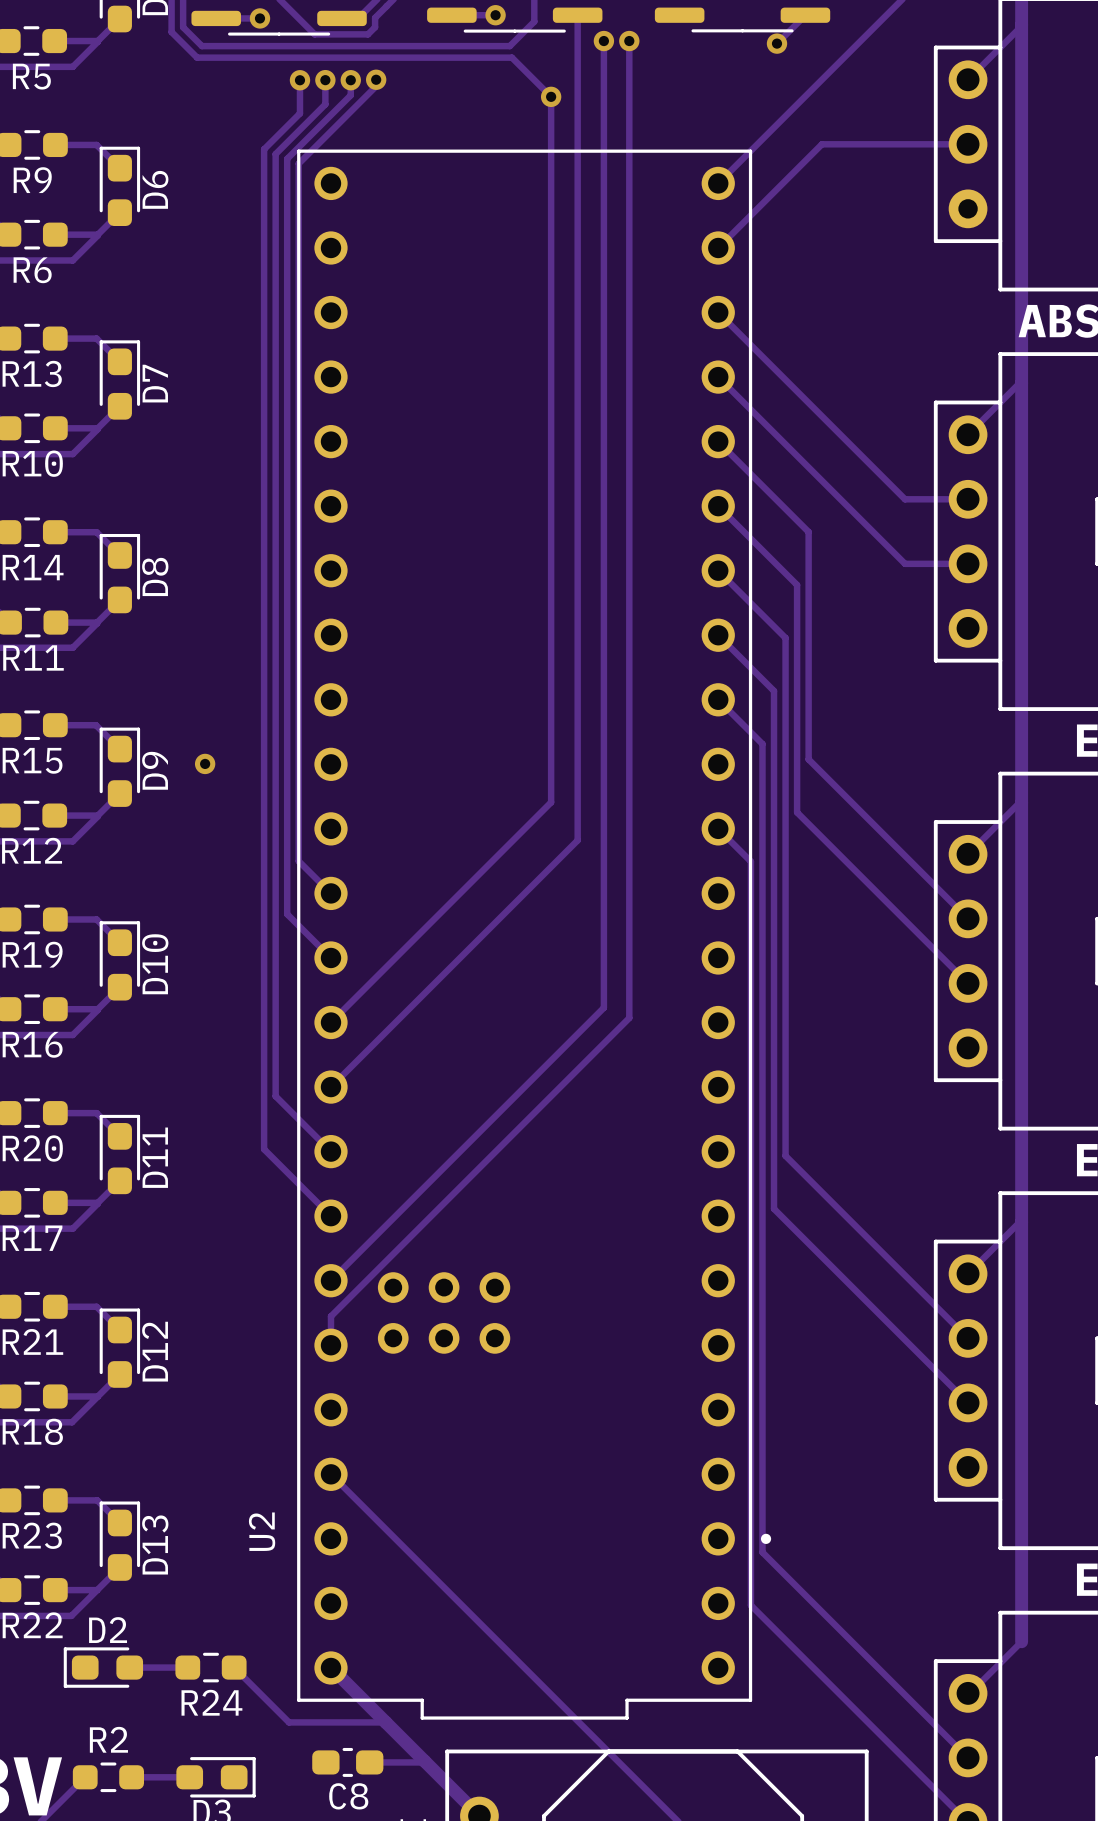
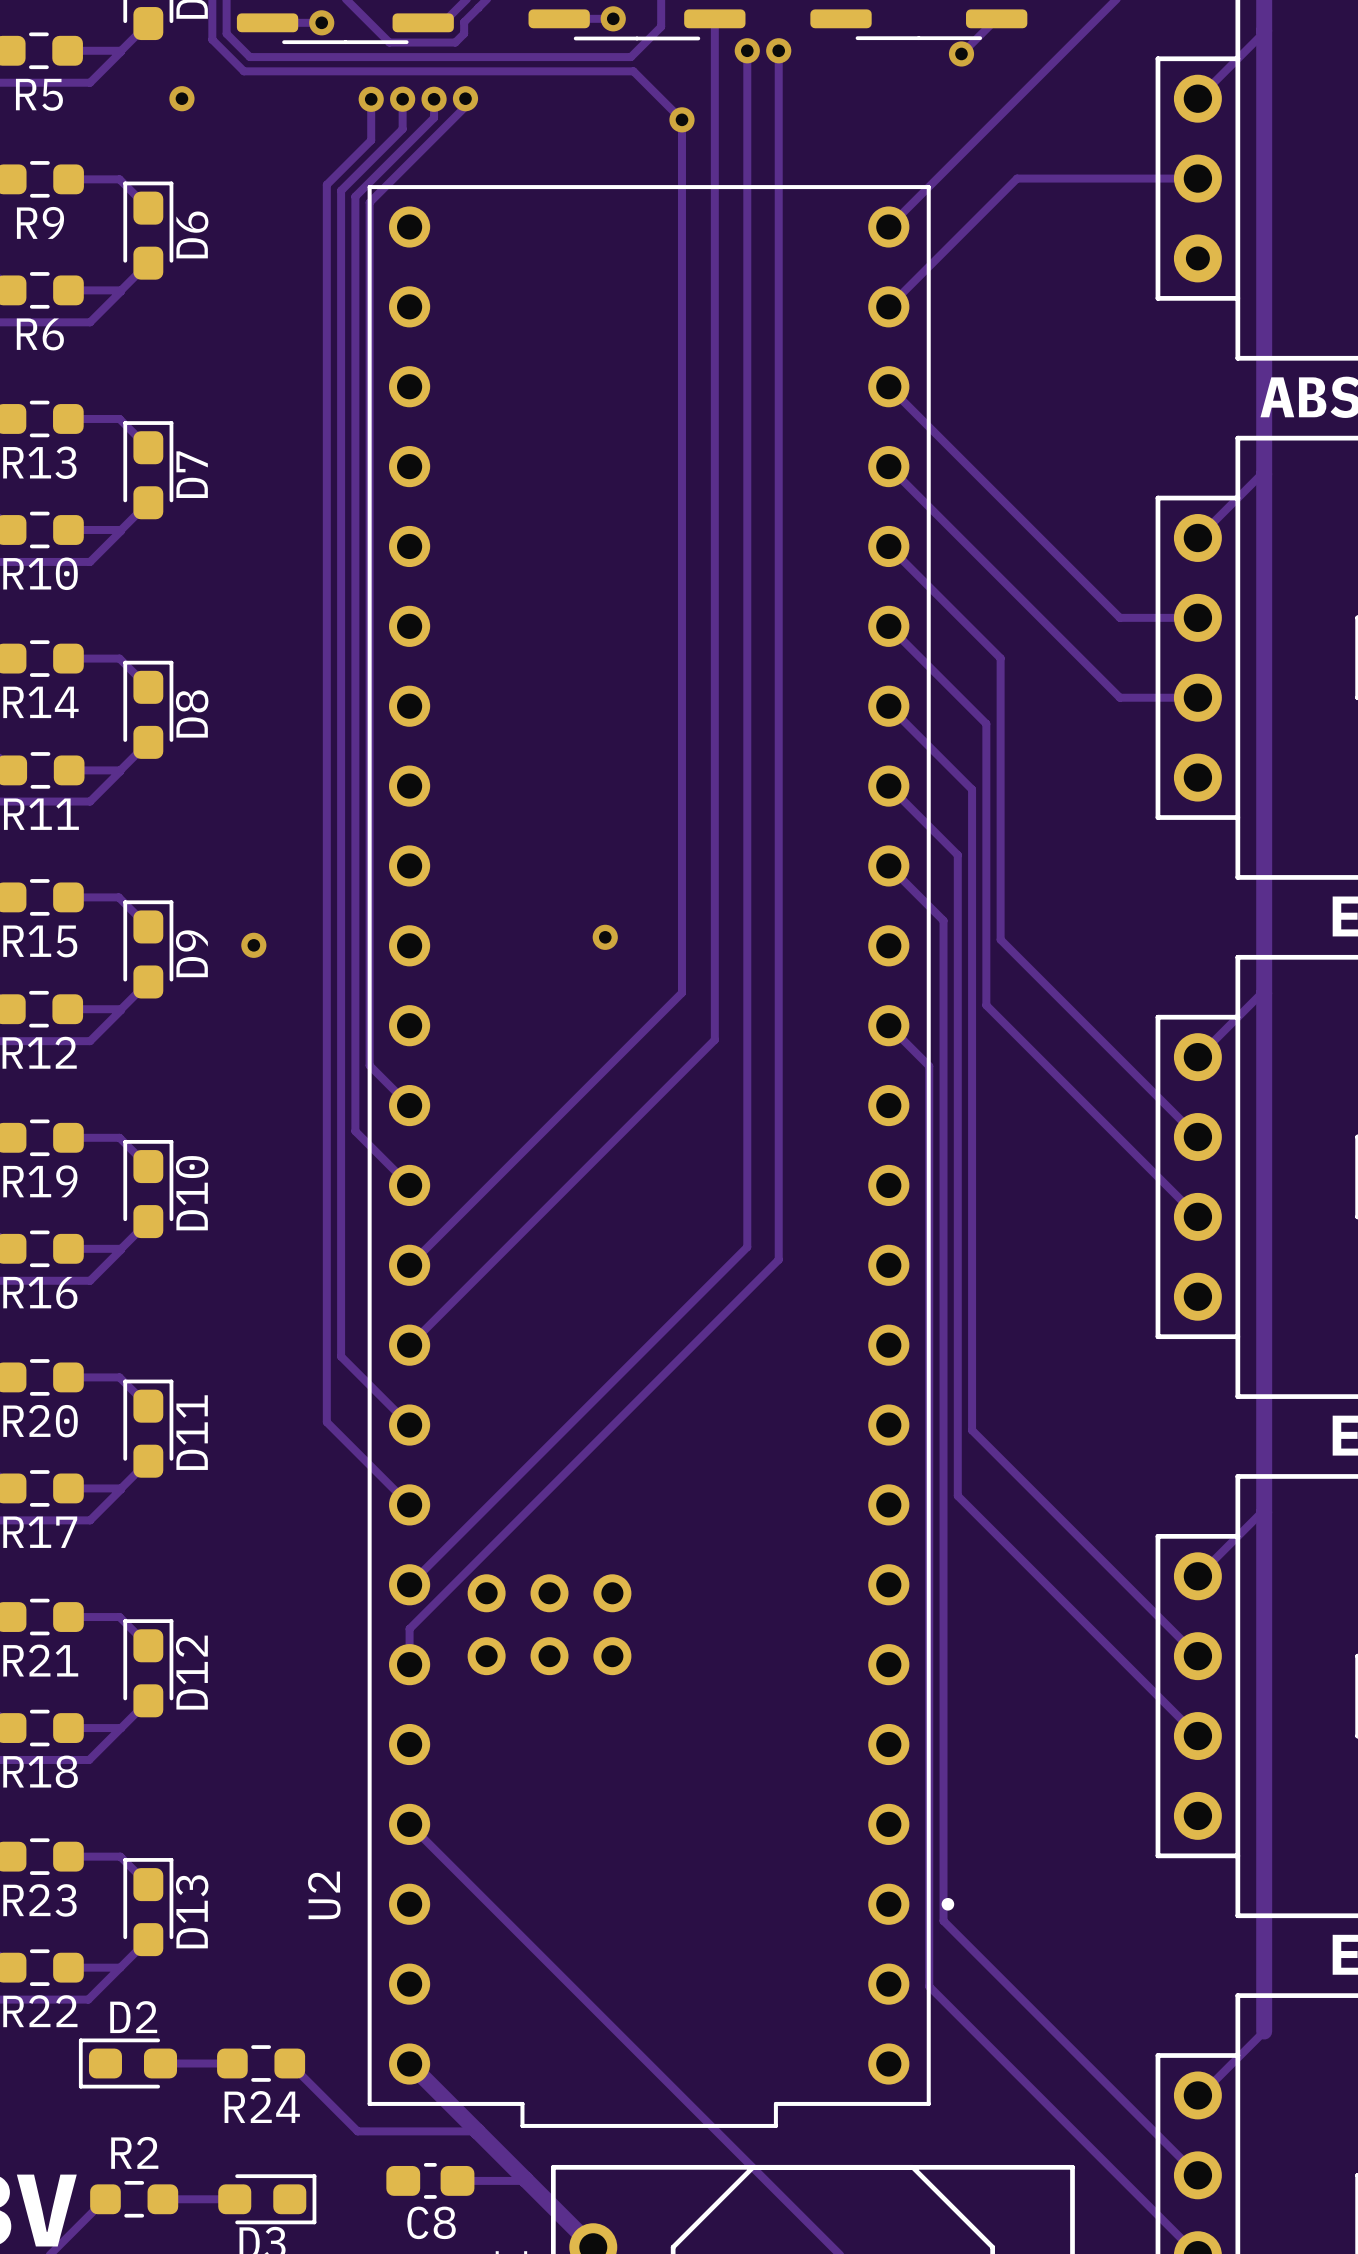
via: none -> (181, 98)
via: none -> (605, 937)

